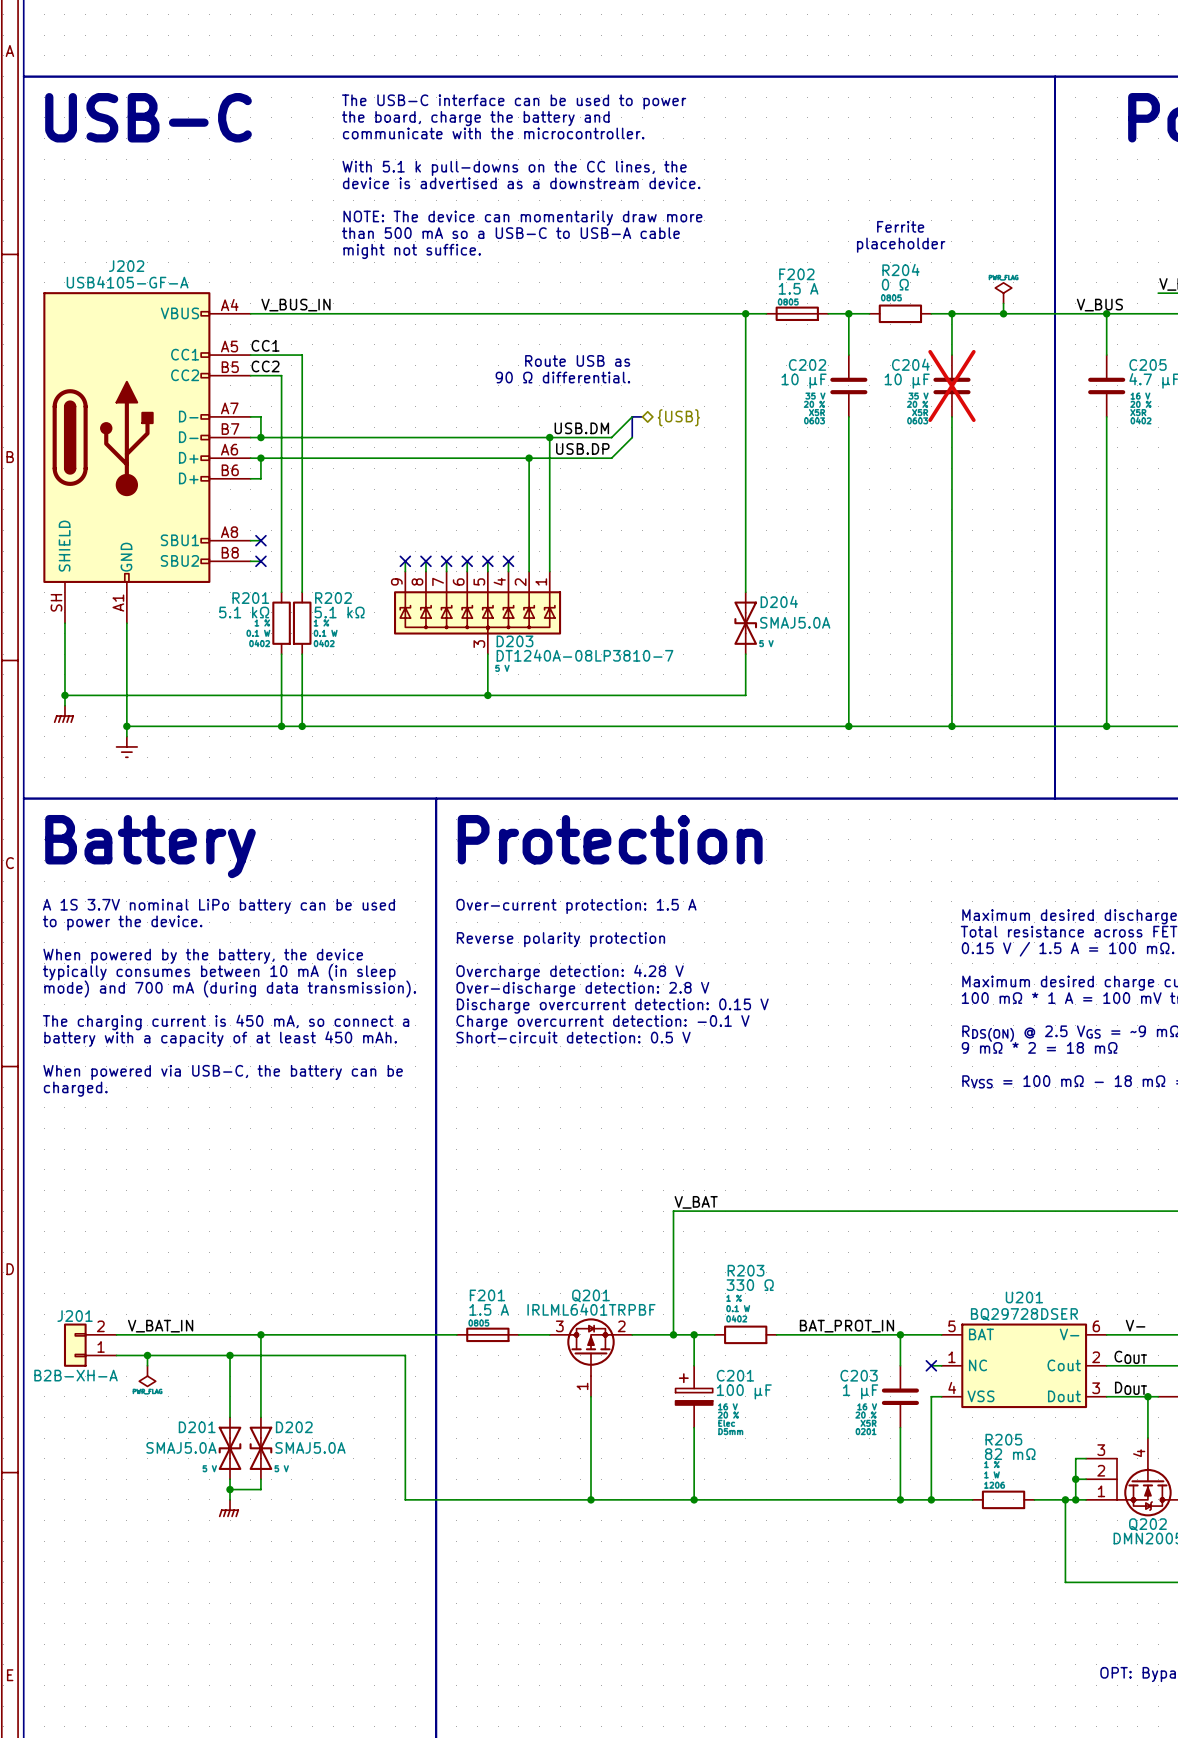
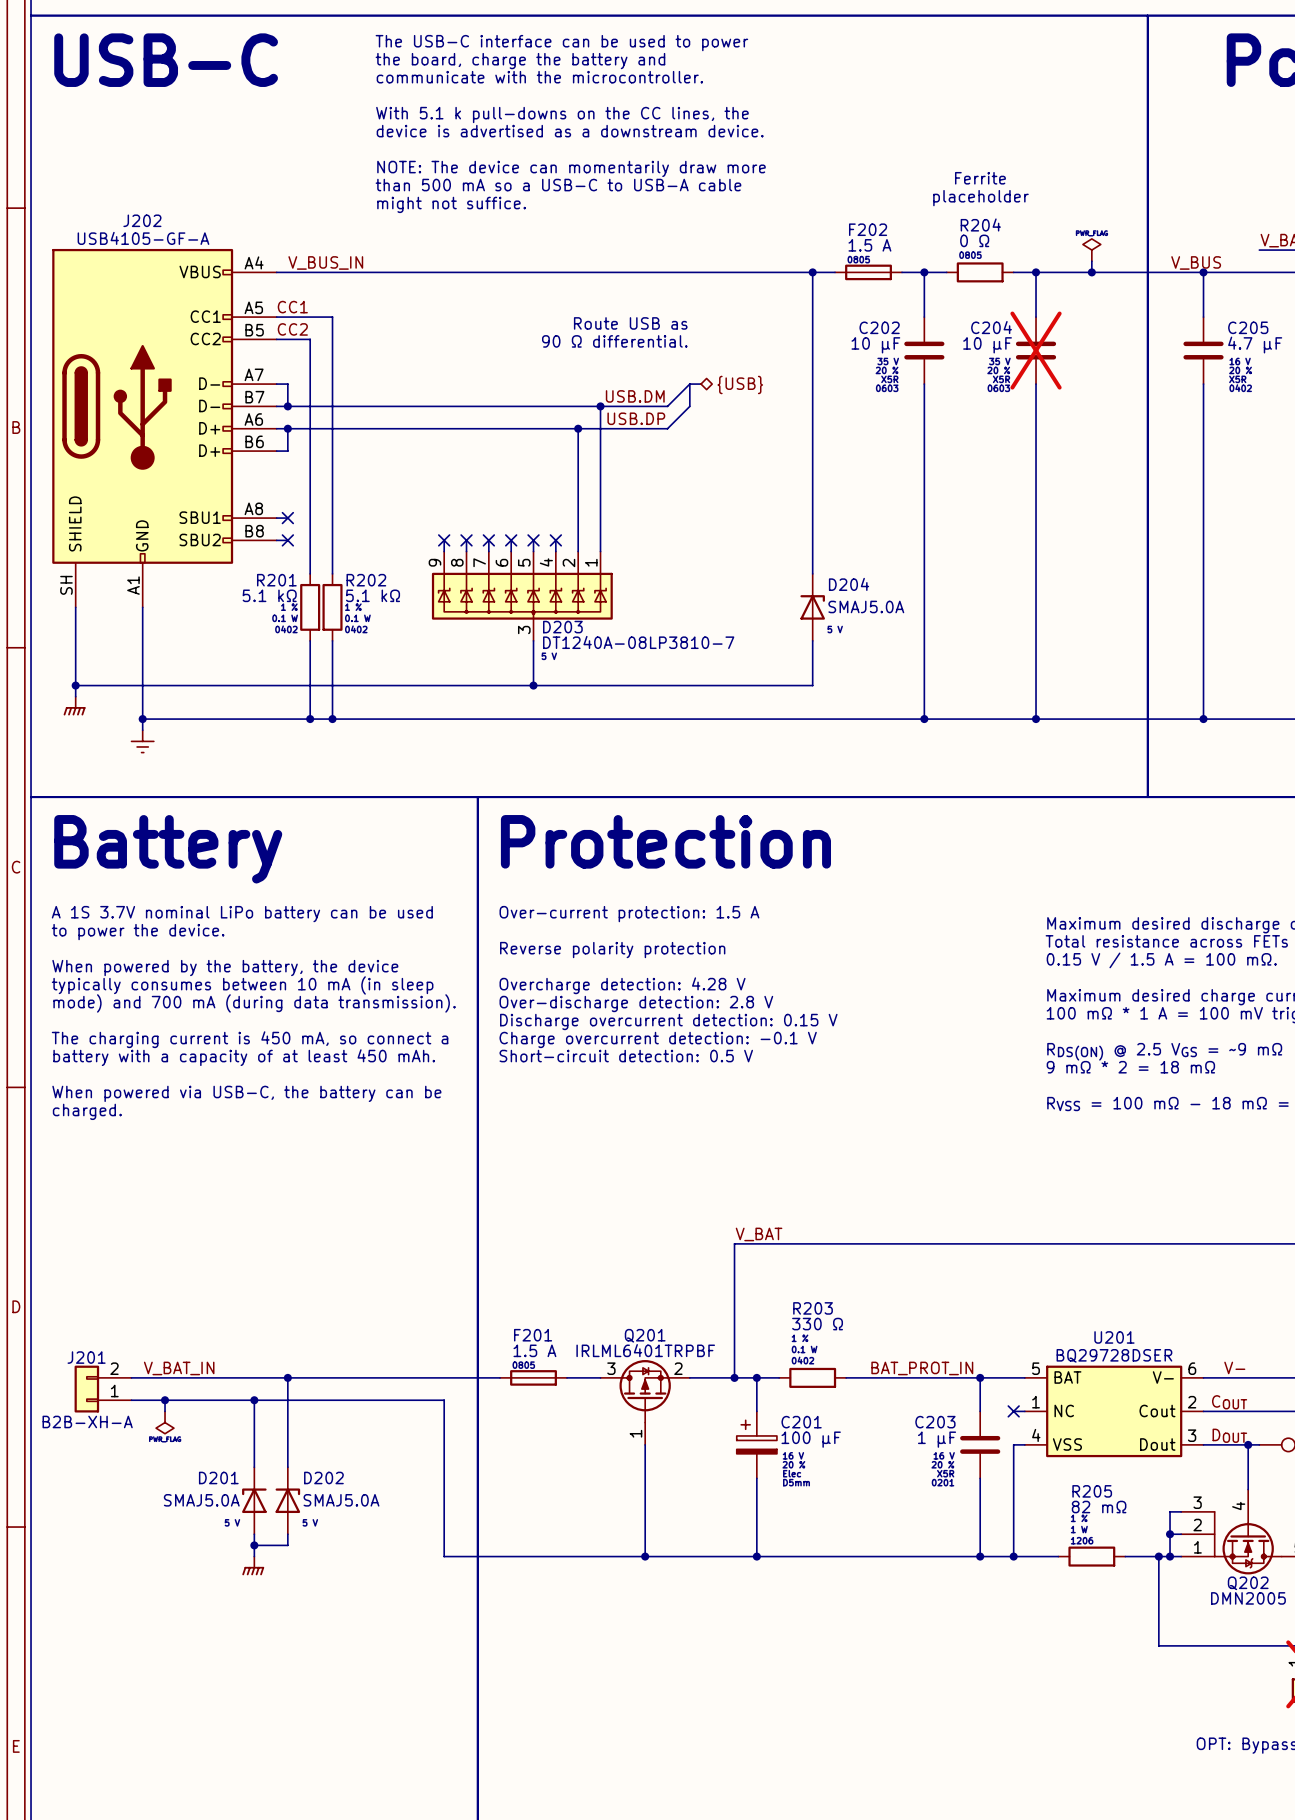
D204 symbol: [734, 592, 758, 655] -> [800, 573, 825, 641]
D201 symbol: [218, 1417, 242, 1480] -> [242, 1467, 267, 1535]
D202 symbol: [249, 1417, 273, 1480] -> [275, 1467, 301, 1535]

